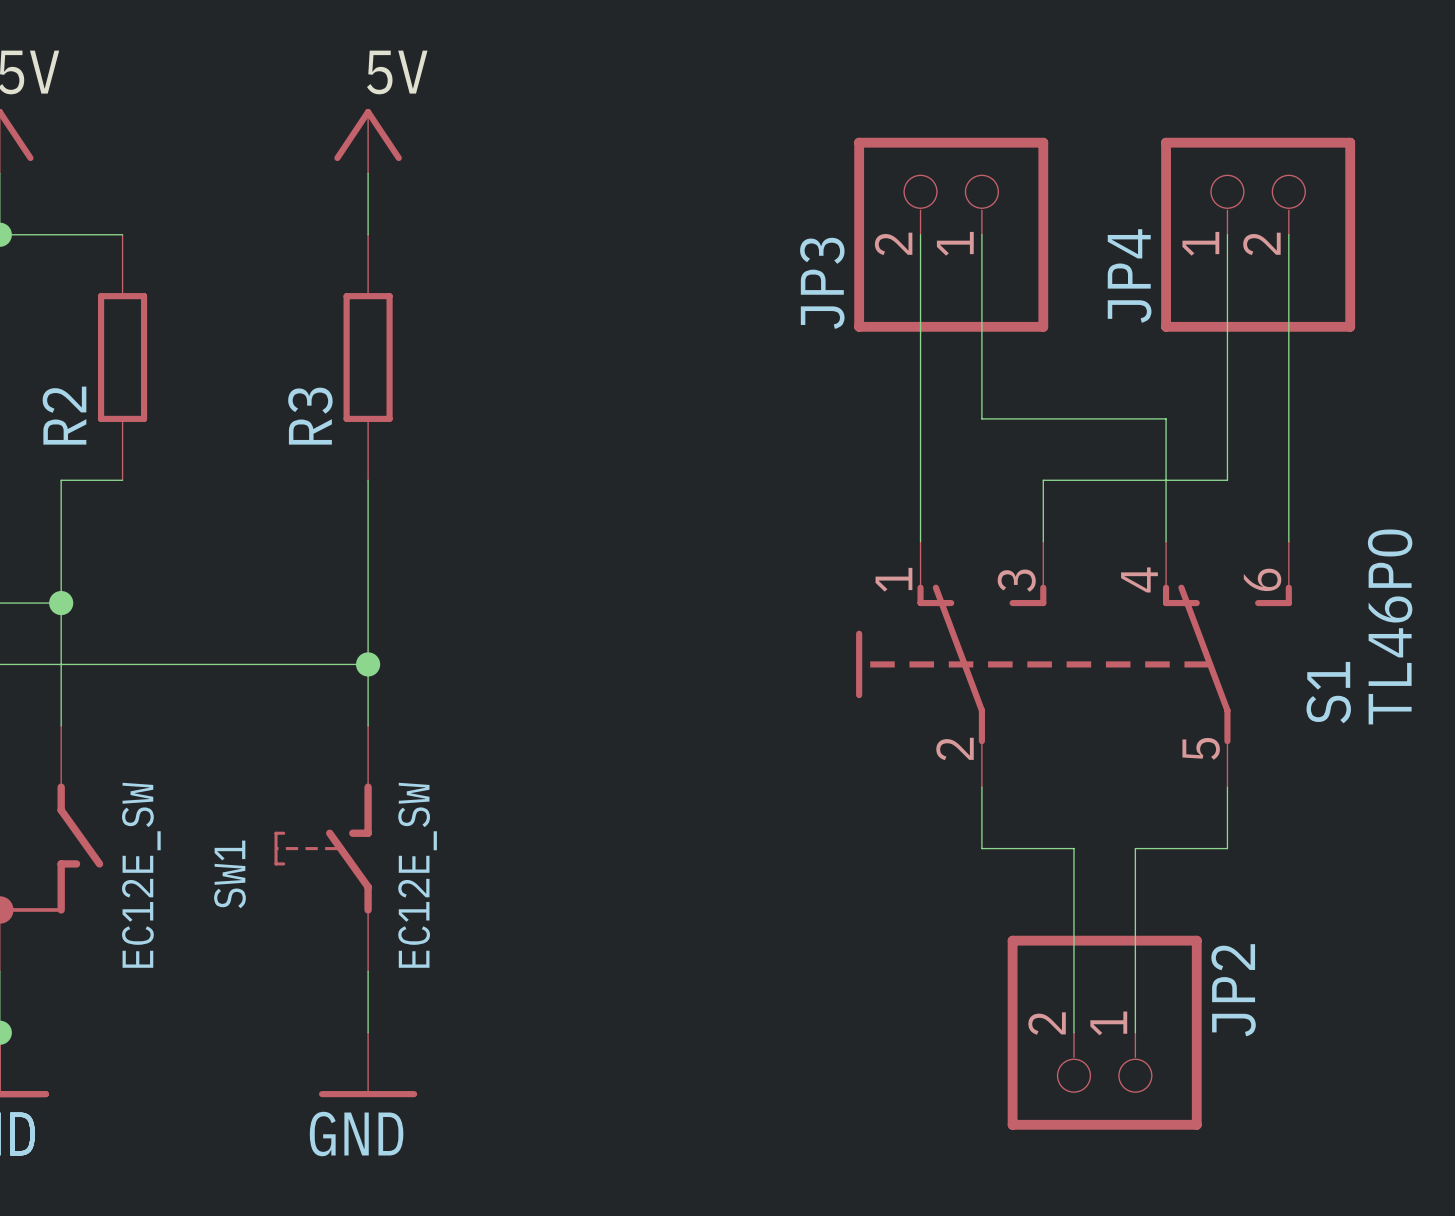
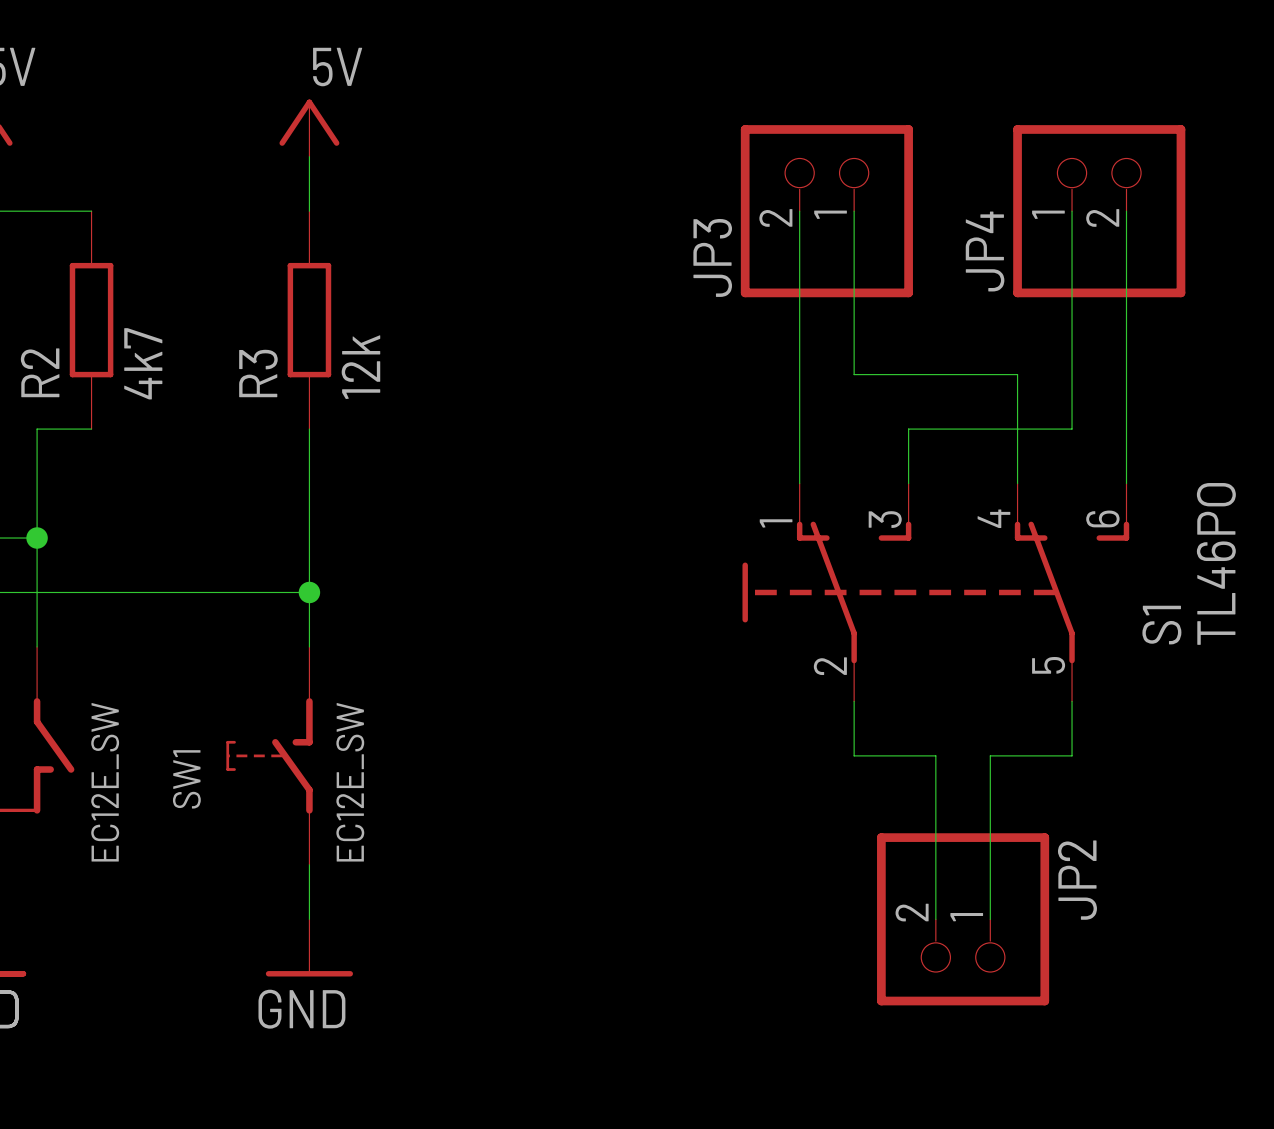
R3 value: none -> 12k (360, 367)
R2 value: none -> 4k7 (143, 363)

